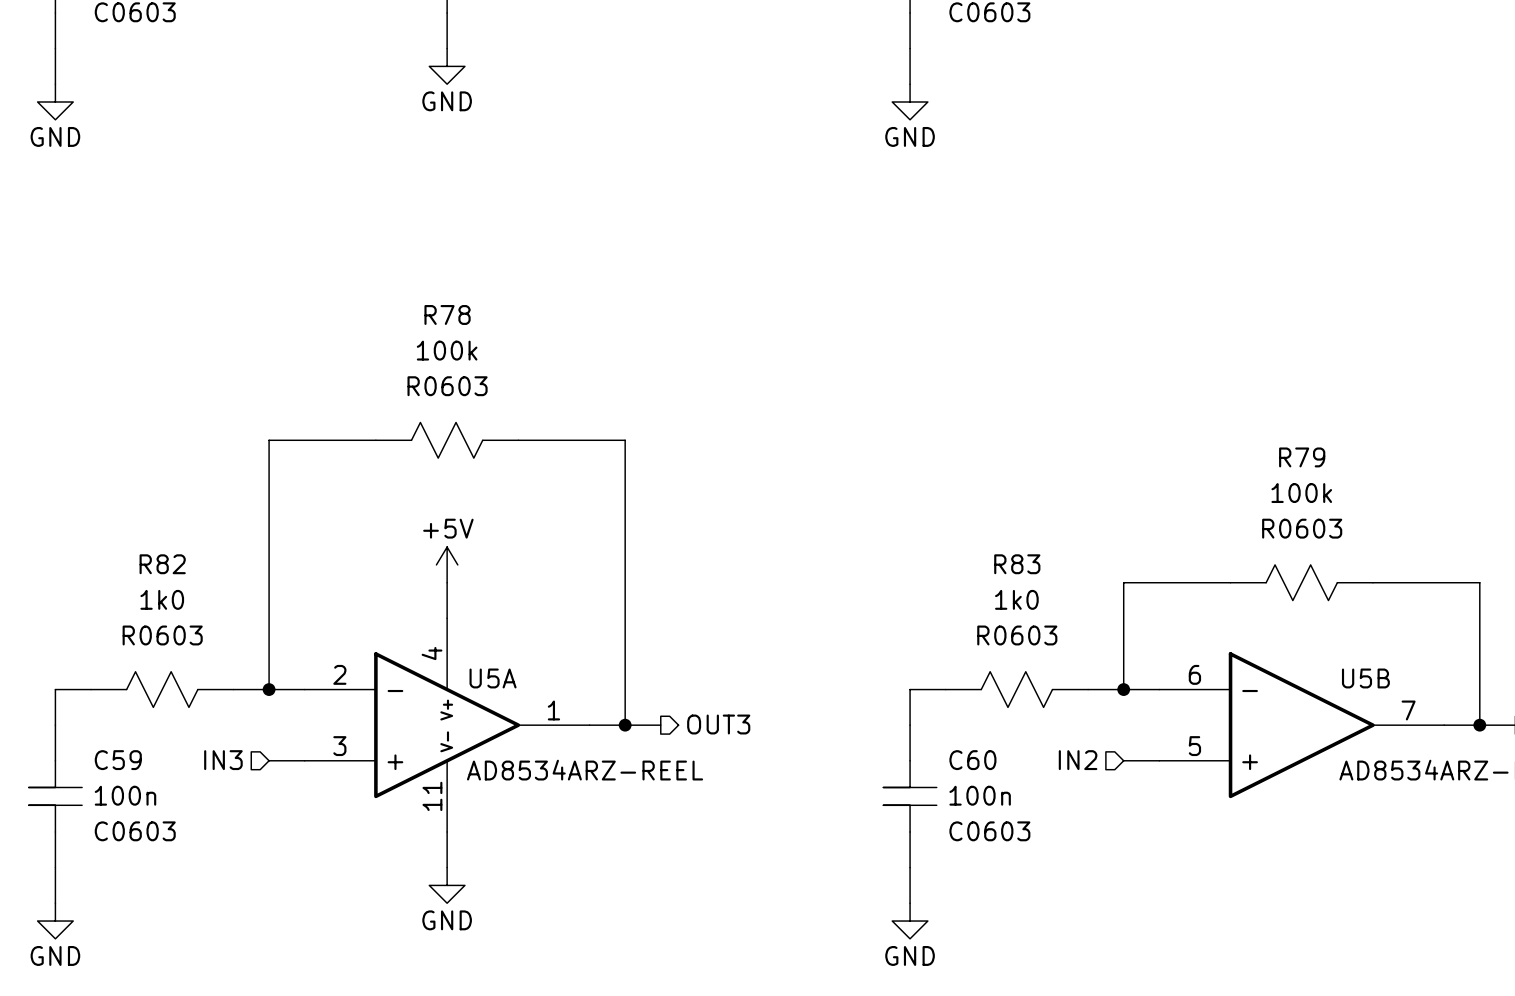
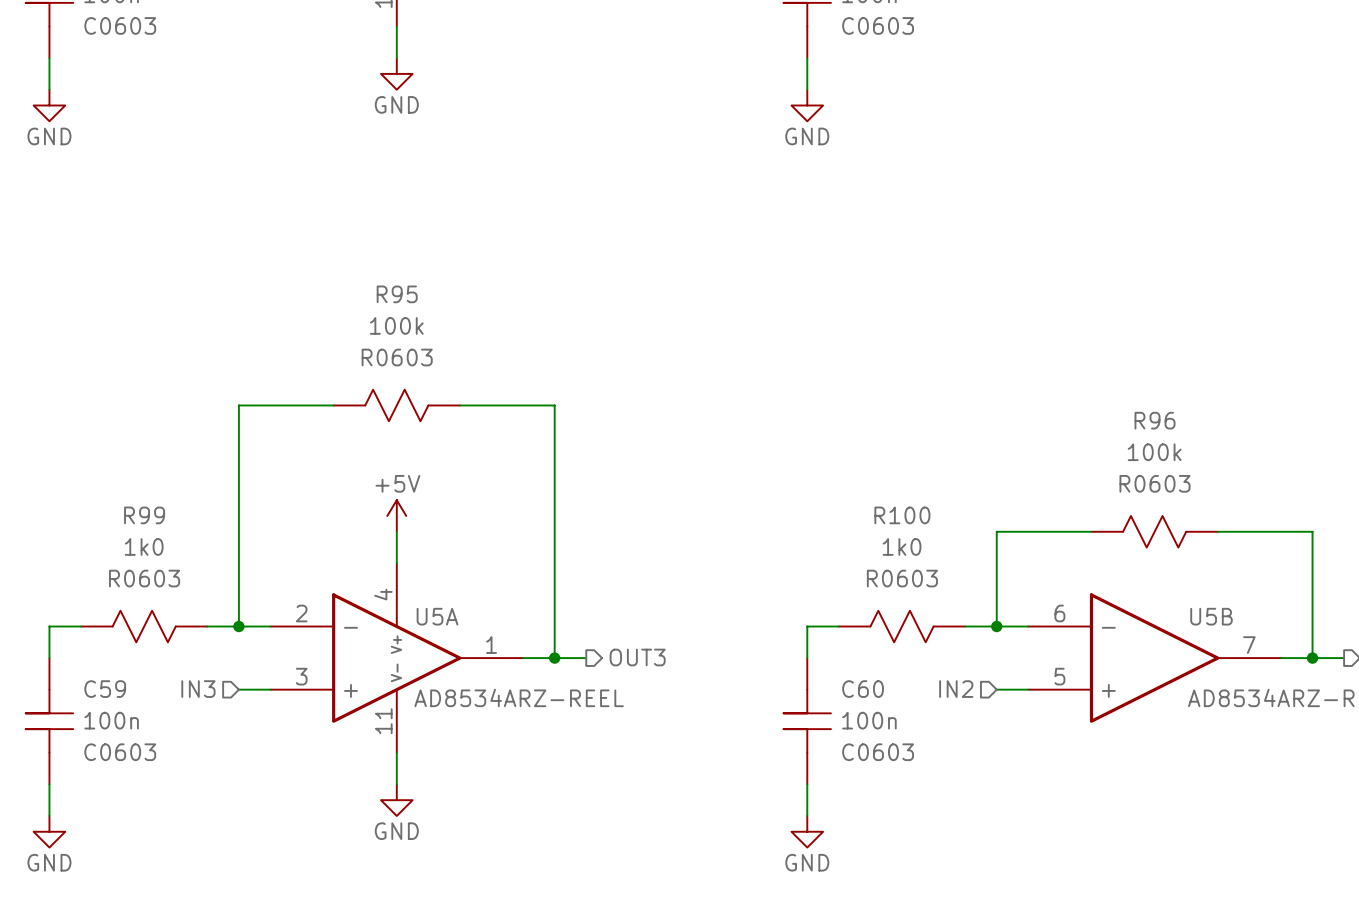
R78 name: R78 (447, 314) -> R95 (397, 294)
R79 name: R79 (1302, 457) -> R96 (1155, 420)
R82 name: R82 (162, 564) -> R99 (144, 515)
R83 name: R83 (1017, 564) -> R100 (902, 515)

